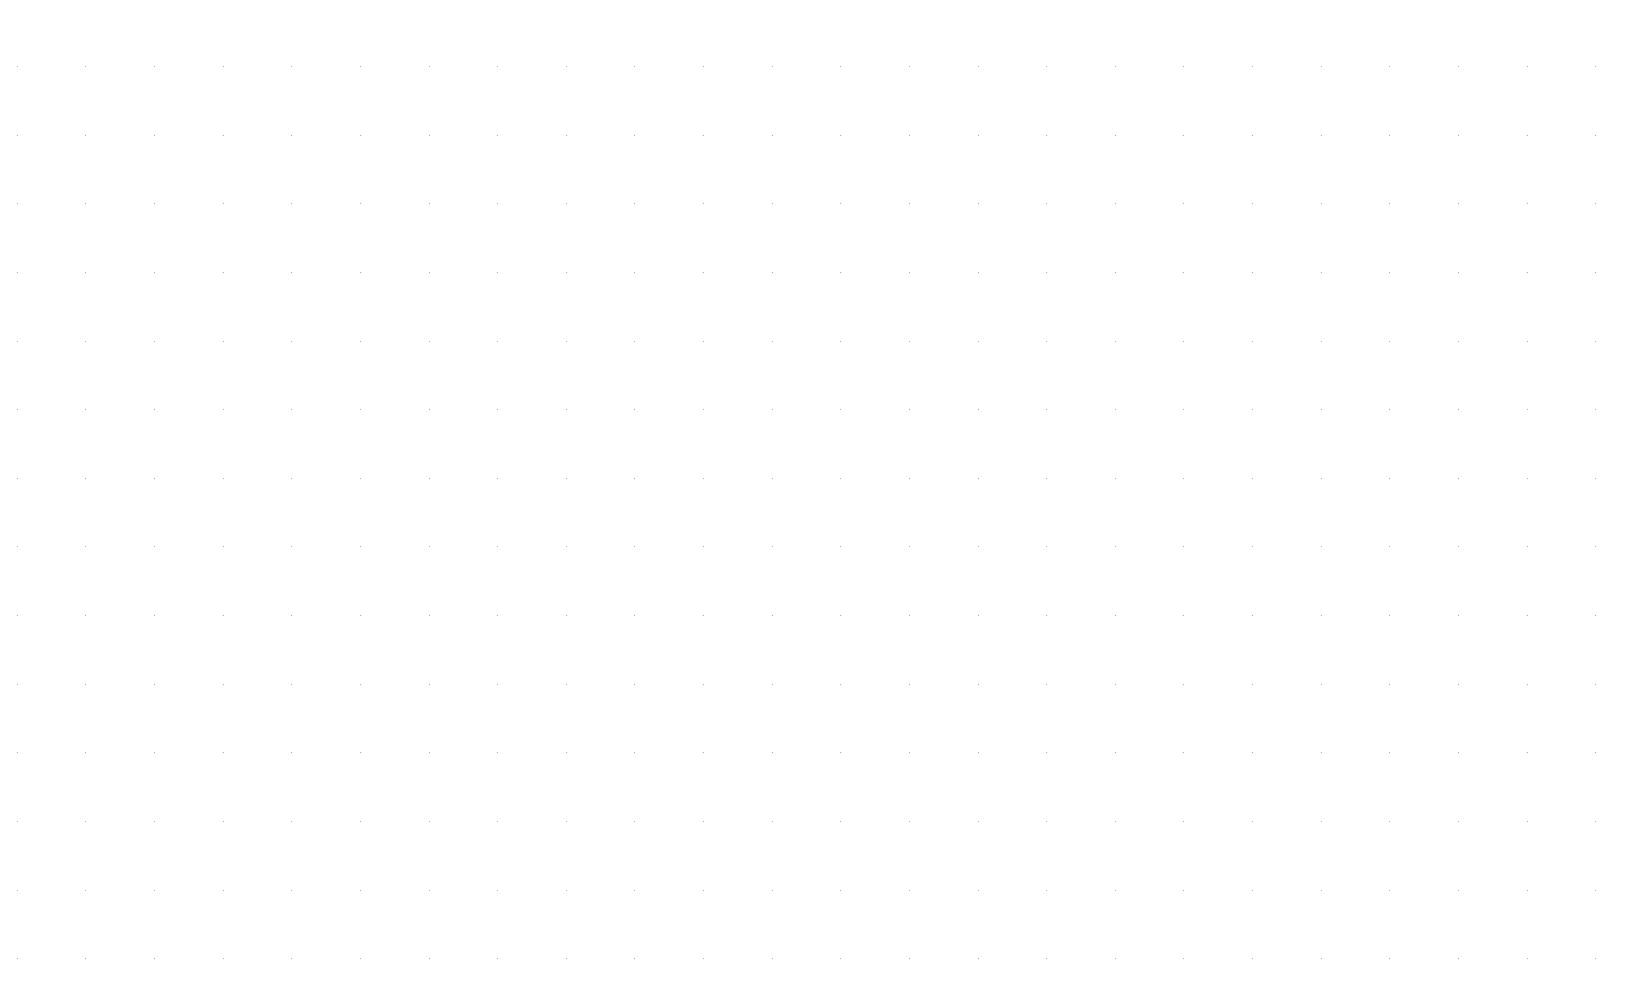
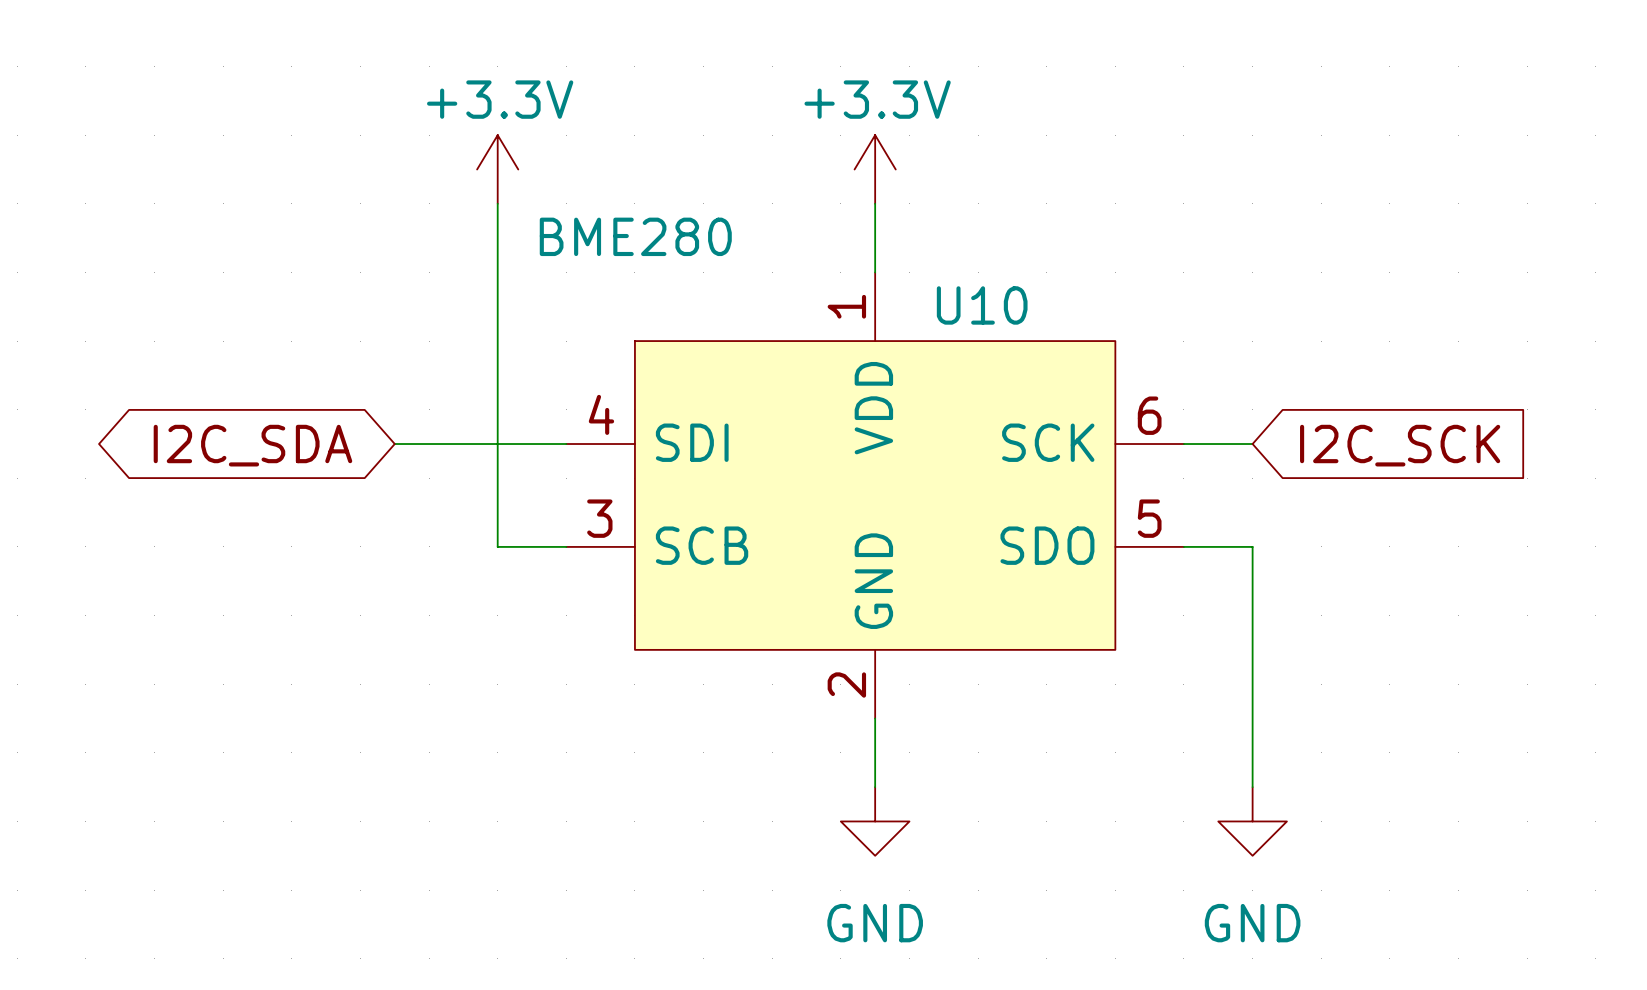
power symbol: none -> +3.3V (497, 169)
power symbol: none -> +3.3V (875, 169)
wire: none -> (497, 203) (497, 546) (566, 546)
wire: none -> (875, 203) (875, 272)
wire: none -> (394, 444) (566, 444)
wire: none -> (1183, 444) (1252, 444)
global label: none -> I2C_SDA (252, 445)
global label: none -> I2C_SCK (1400, 445)
U10: none -> BME280 (875, 495)
wire: none -> (1183, 546) (1252, 546) (1252, 787)
wire: none -> (875, 718) (875, 787)
power symbol: none -> GND (875, 821)
power symbol: none -> GND (1252, 821)

